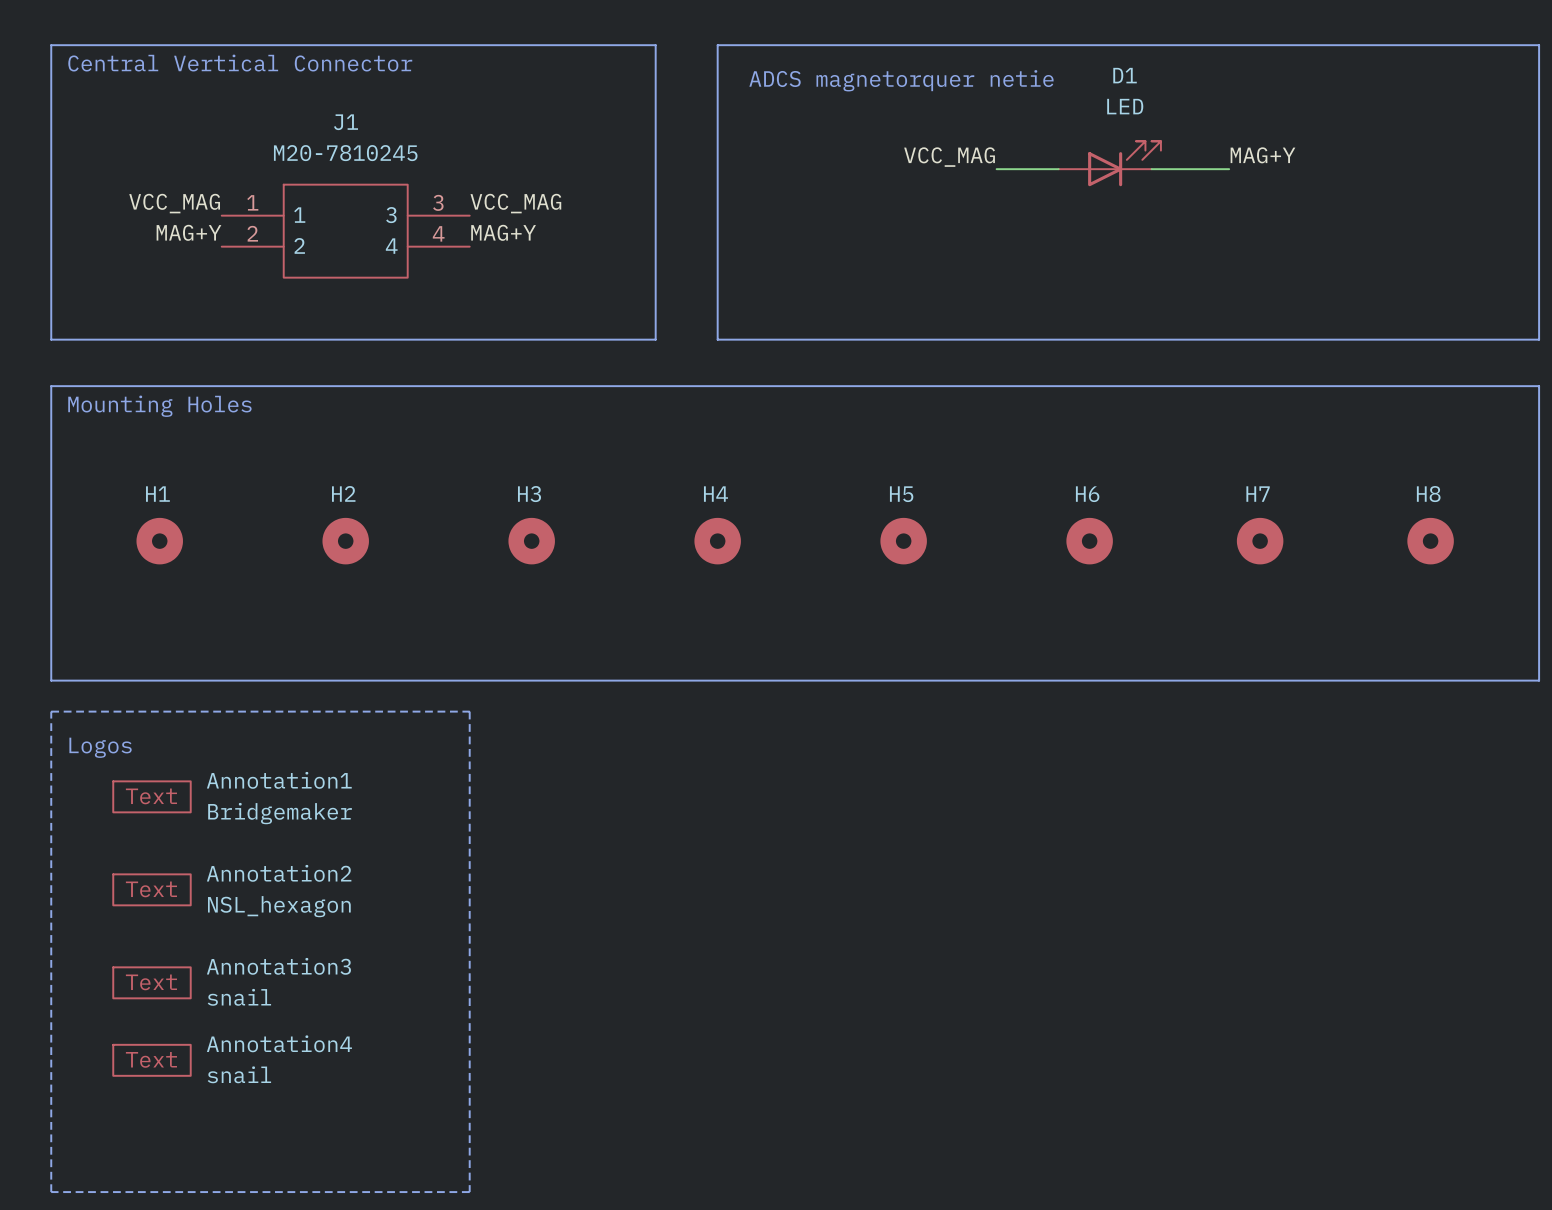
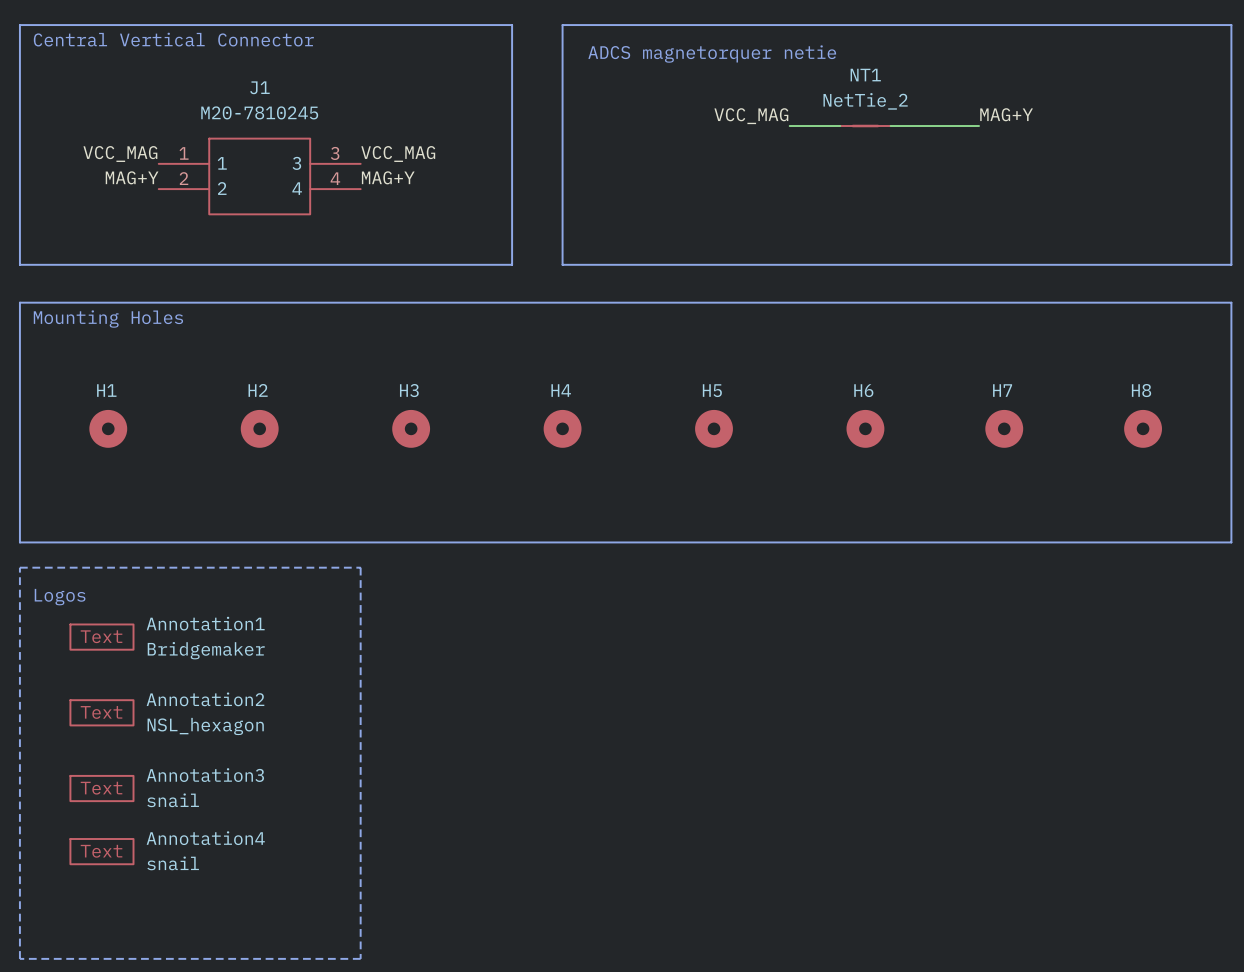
D1: LED (1109, 163) -> none
NT1: none -> NetTie_2 (865, 126)

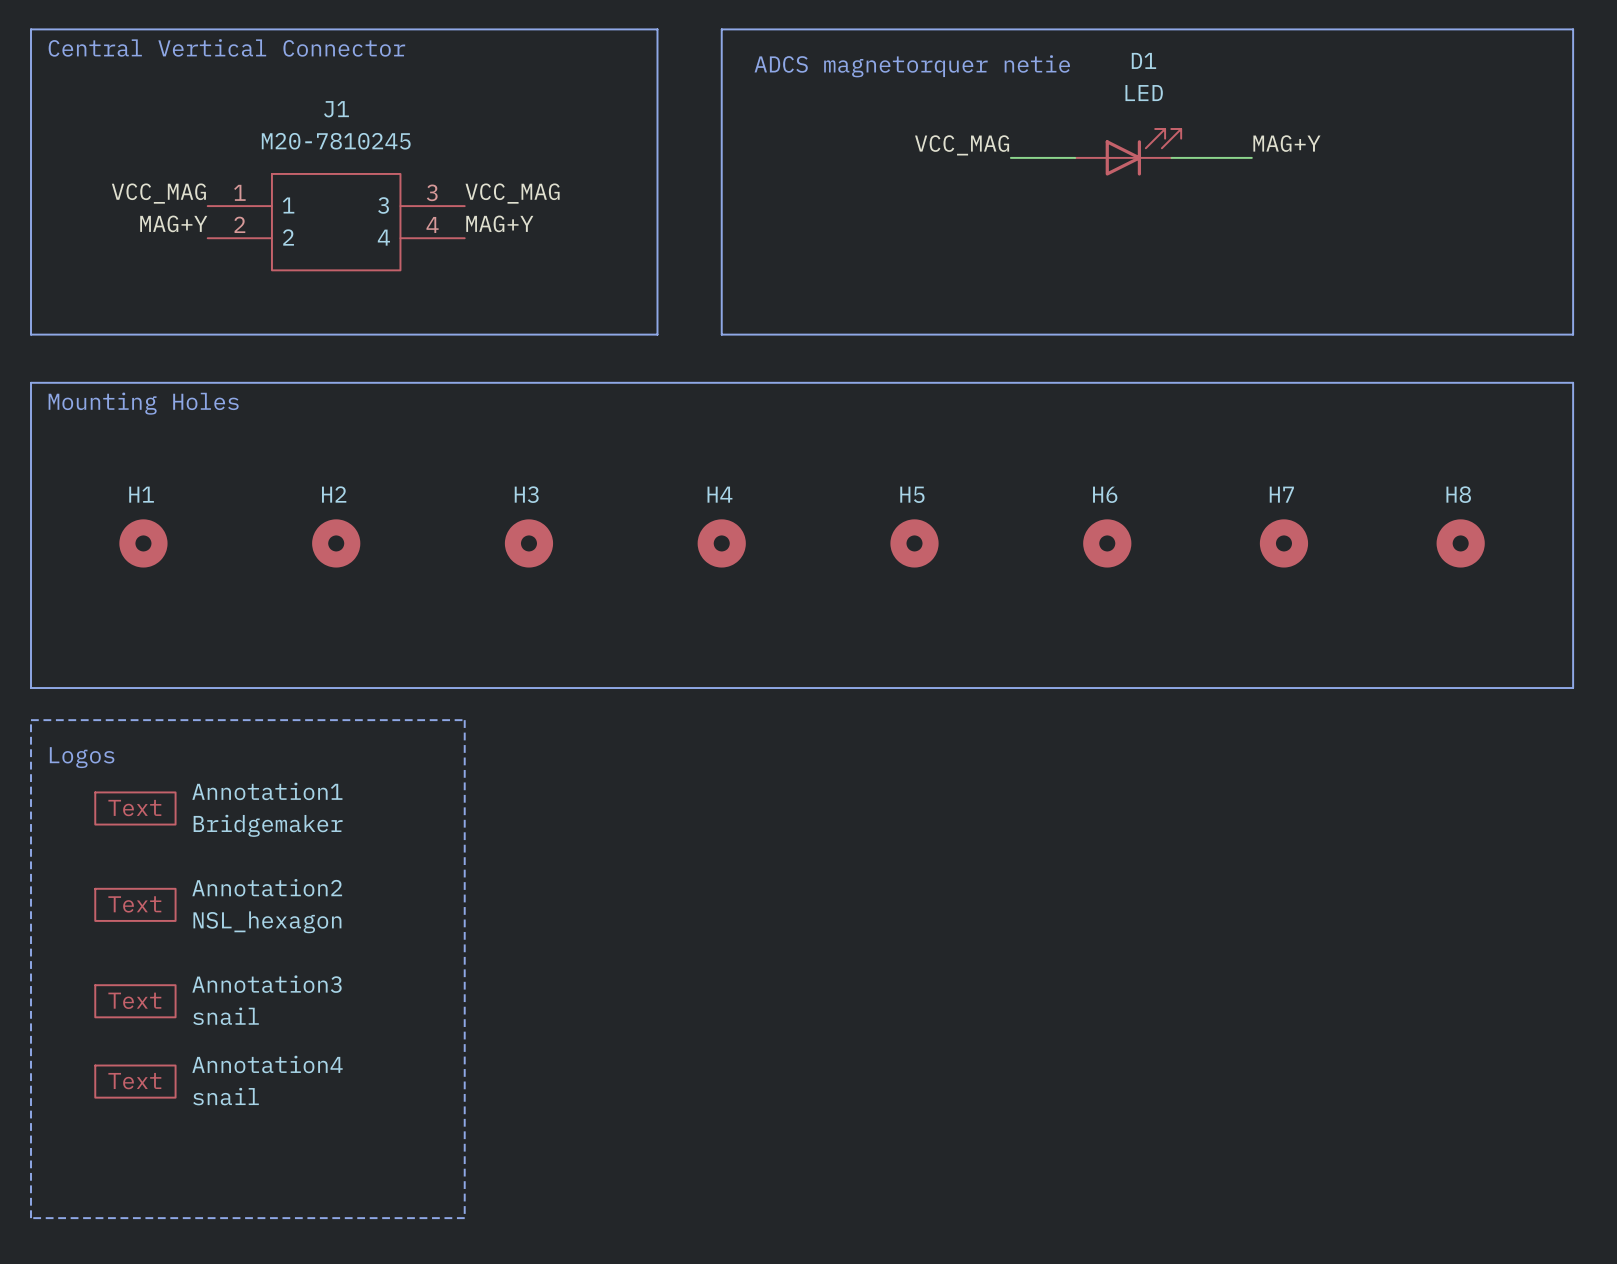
D1: none -> LED (1128, 152)
NT1: NetTie_2 (865, 126) -> none

